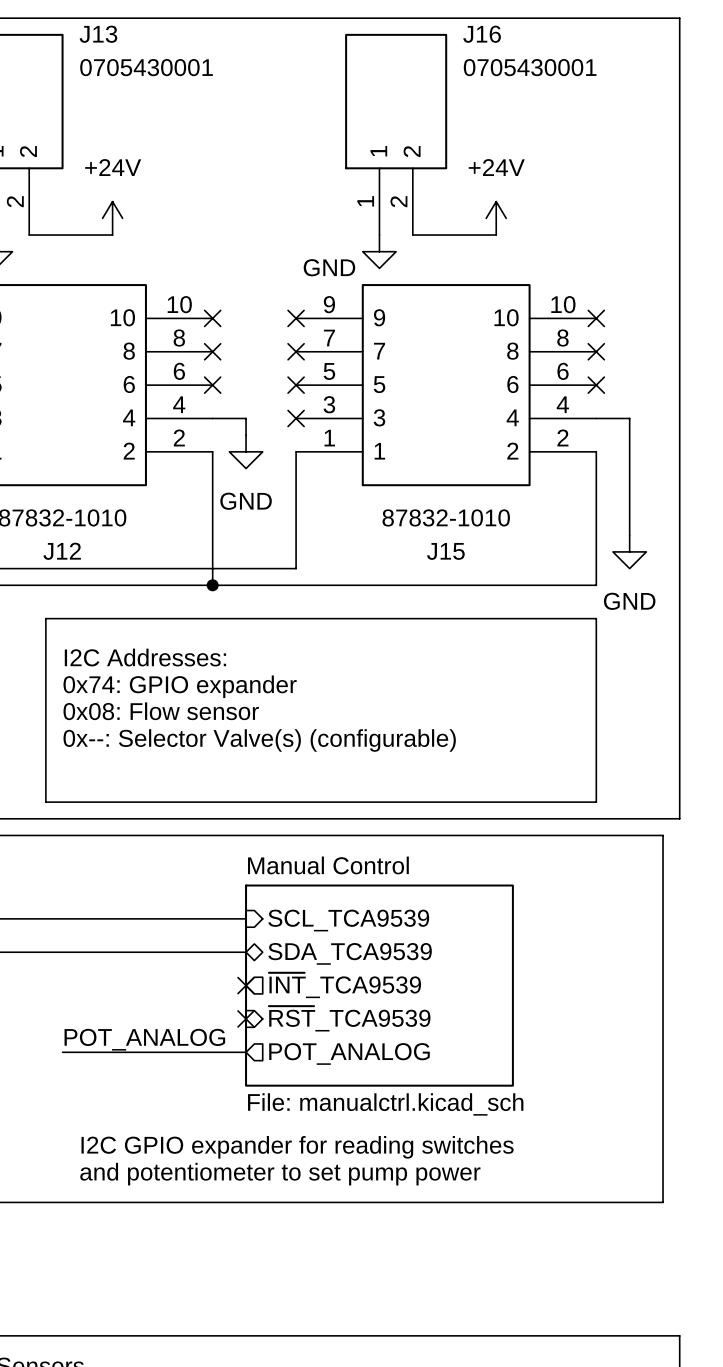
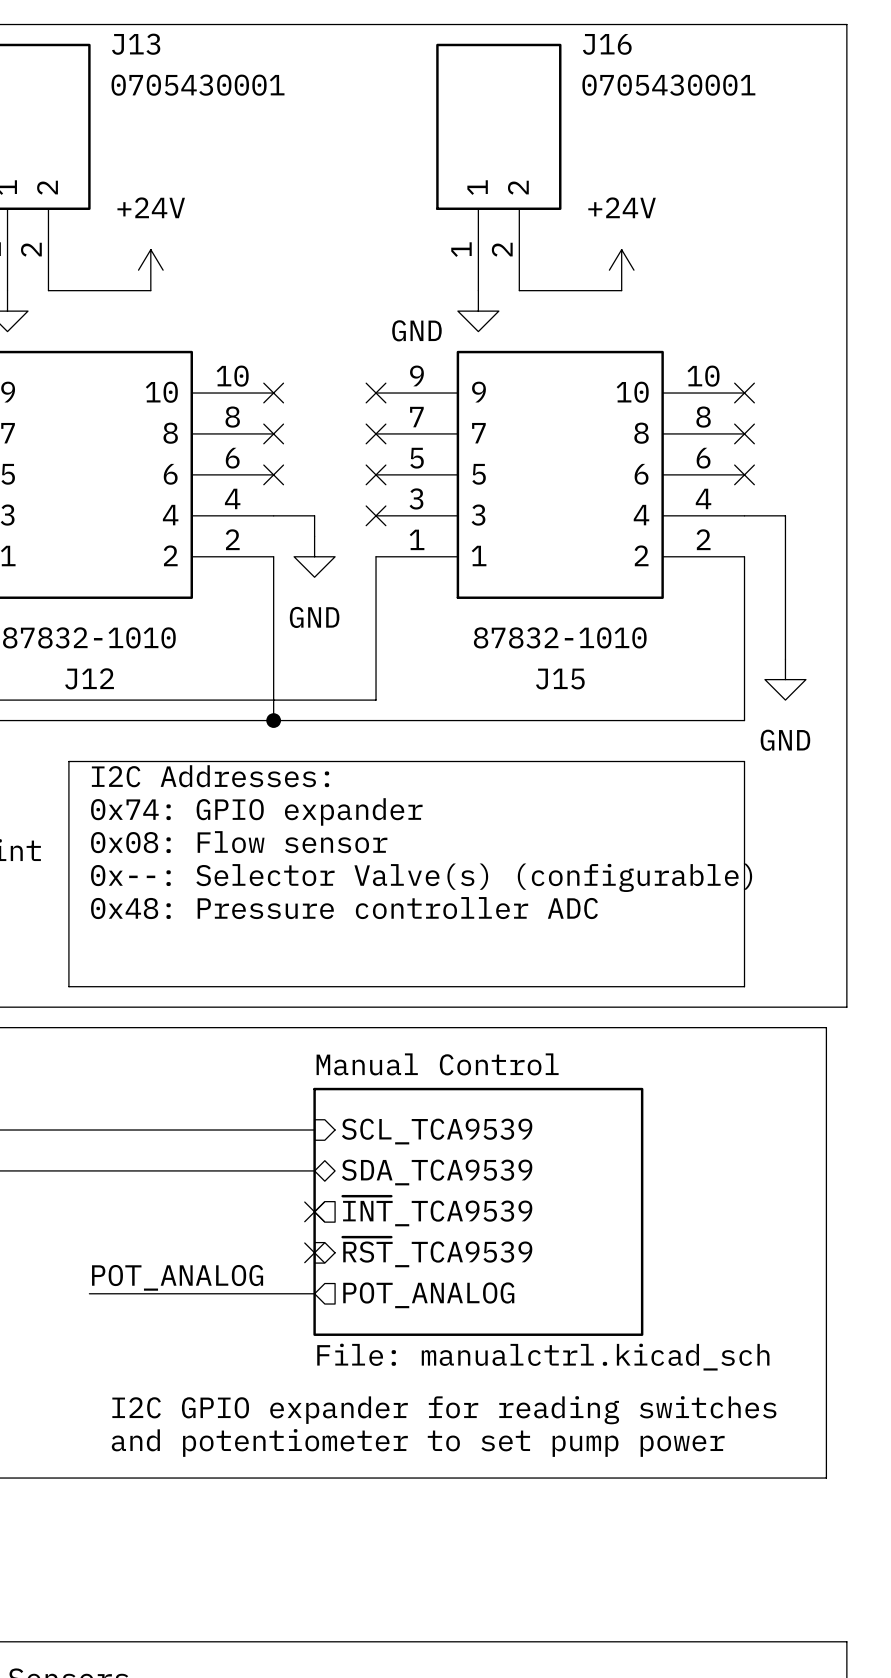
text: none -> I2C Addresses: (210, 776)
text: I2C Addresses: (145, 657) -> 0x74: GPIO expander (256, 811)
text: 0x74: GPIO expander (180, 686) -> 0x08: Flow sensor (239, 842)
text: 0x08: Flow sensor (161, 711) -> 0x--: Selector Valve(s) (configurable) (421, 877)
text: 0x--: Selector Valve(s) (configurable) (259, 740) -> 0x48: Pressure controller ADC (344, 908)

